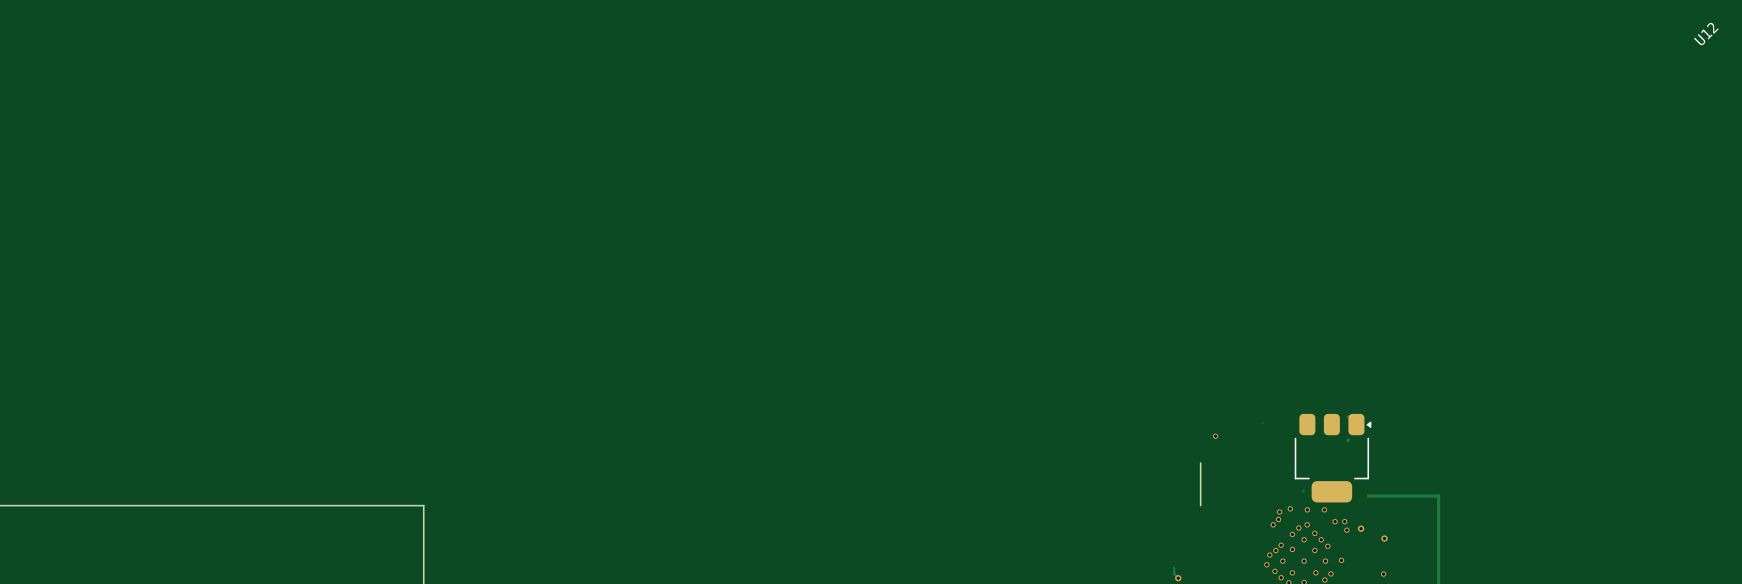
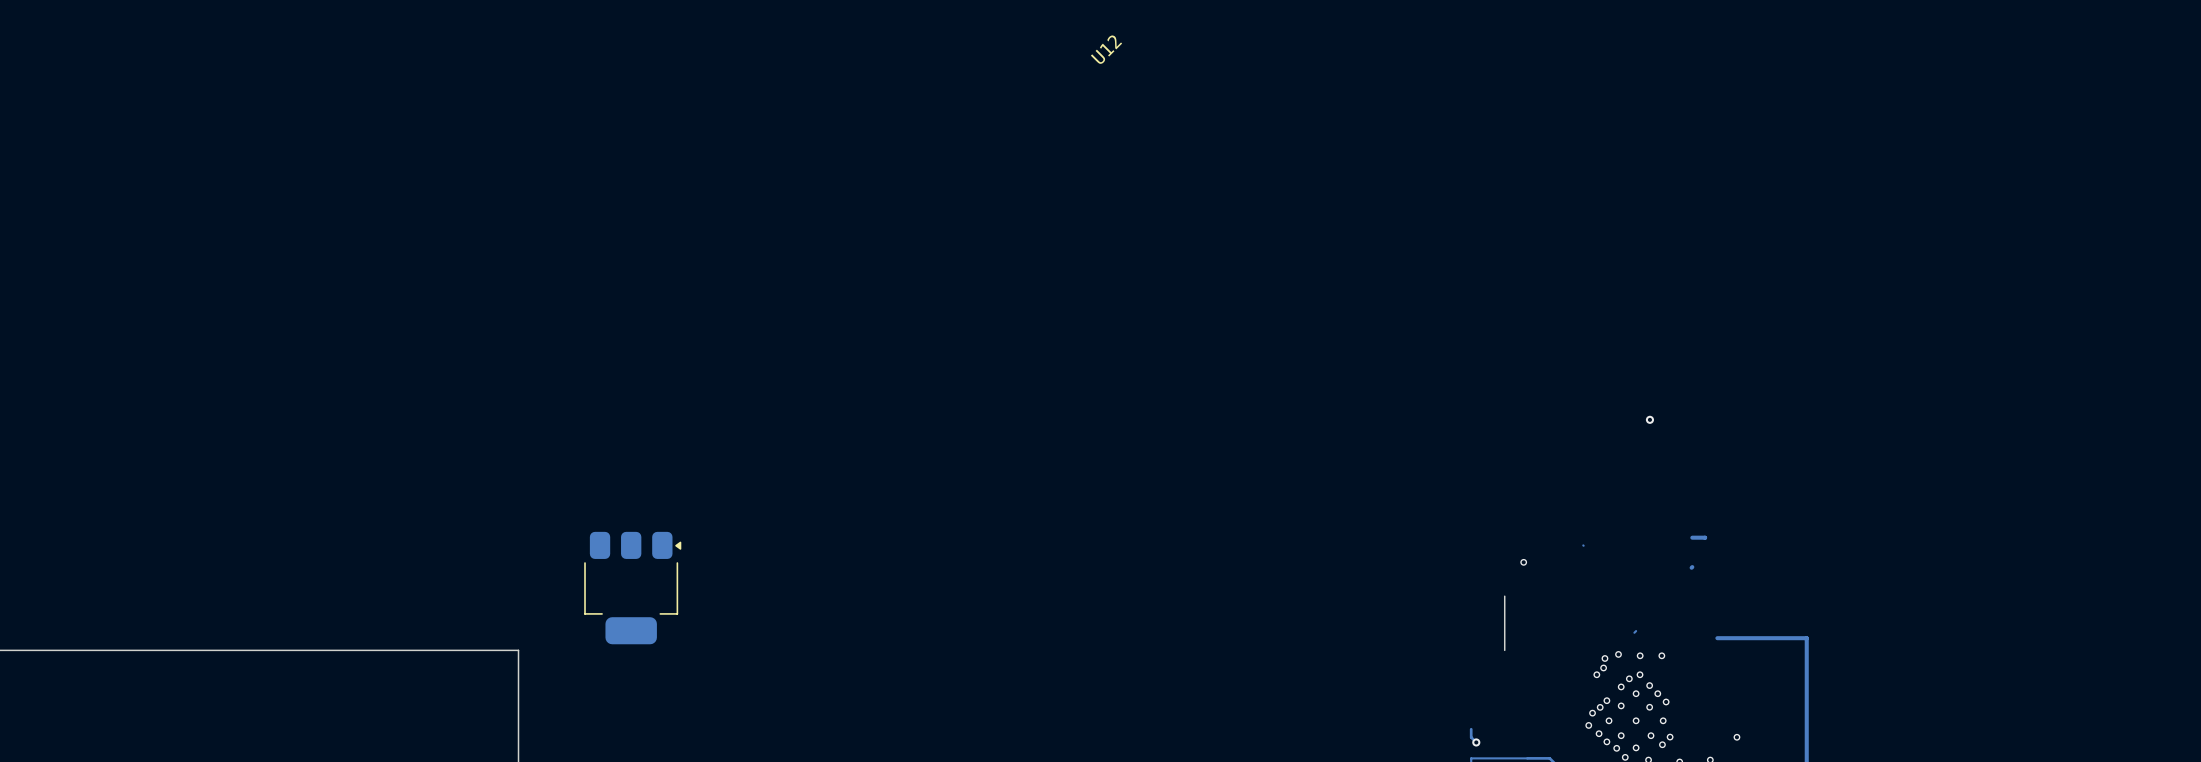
via: none -> (1649, 419)
U12 position: (1333, 458) -> (632, 588)
via: (1335, 521) -> none
via: (1344, 521) -> none
via: (1361, 528) -> none
via: (1346, 530) -> none
via: (1384, 538) -> none
via: (1341, 560) -> none

